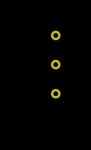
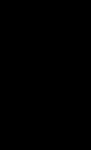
part: (55, 35) -> none
part: (55, 64) -> none
part: (55, 93) -> none

